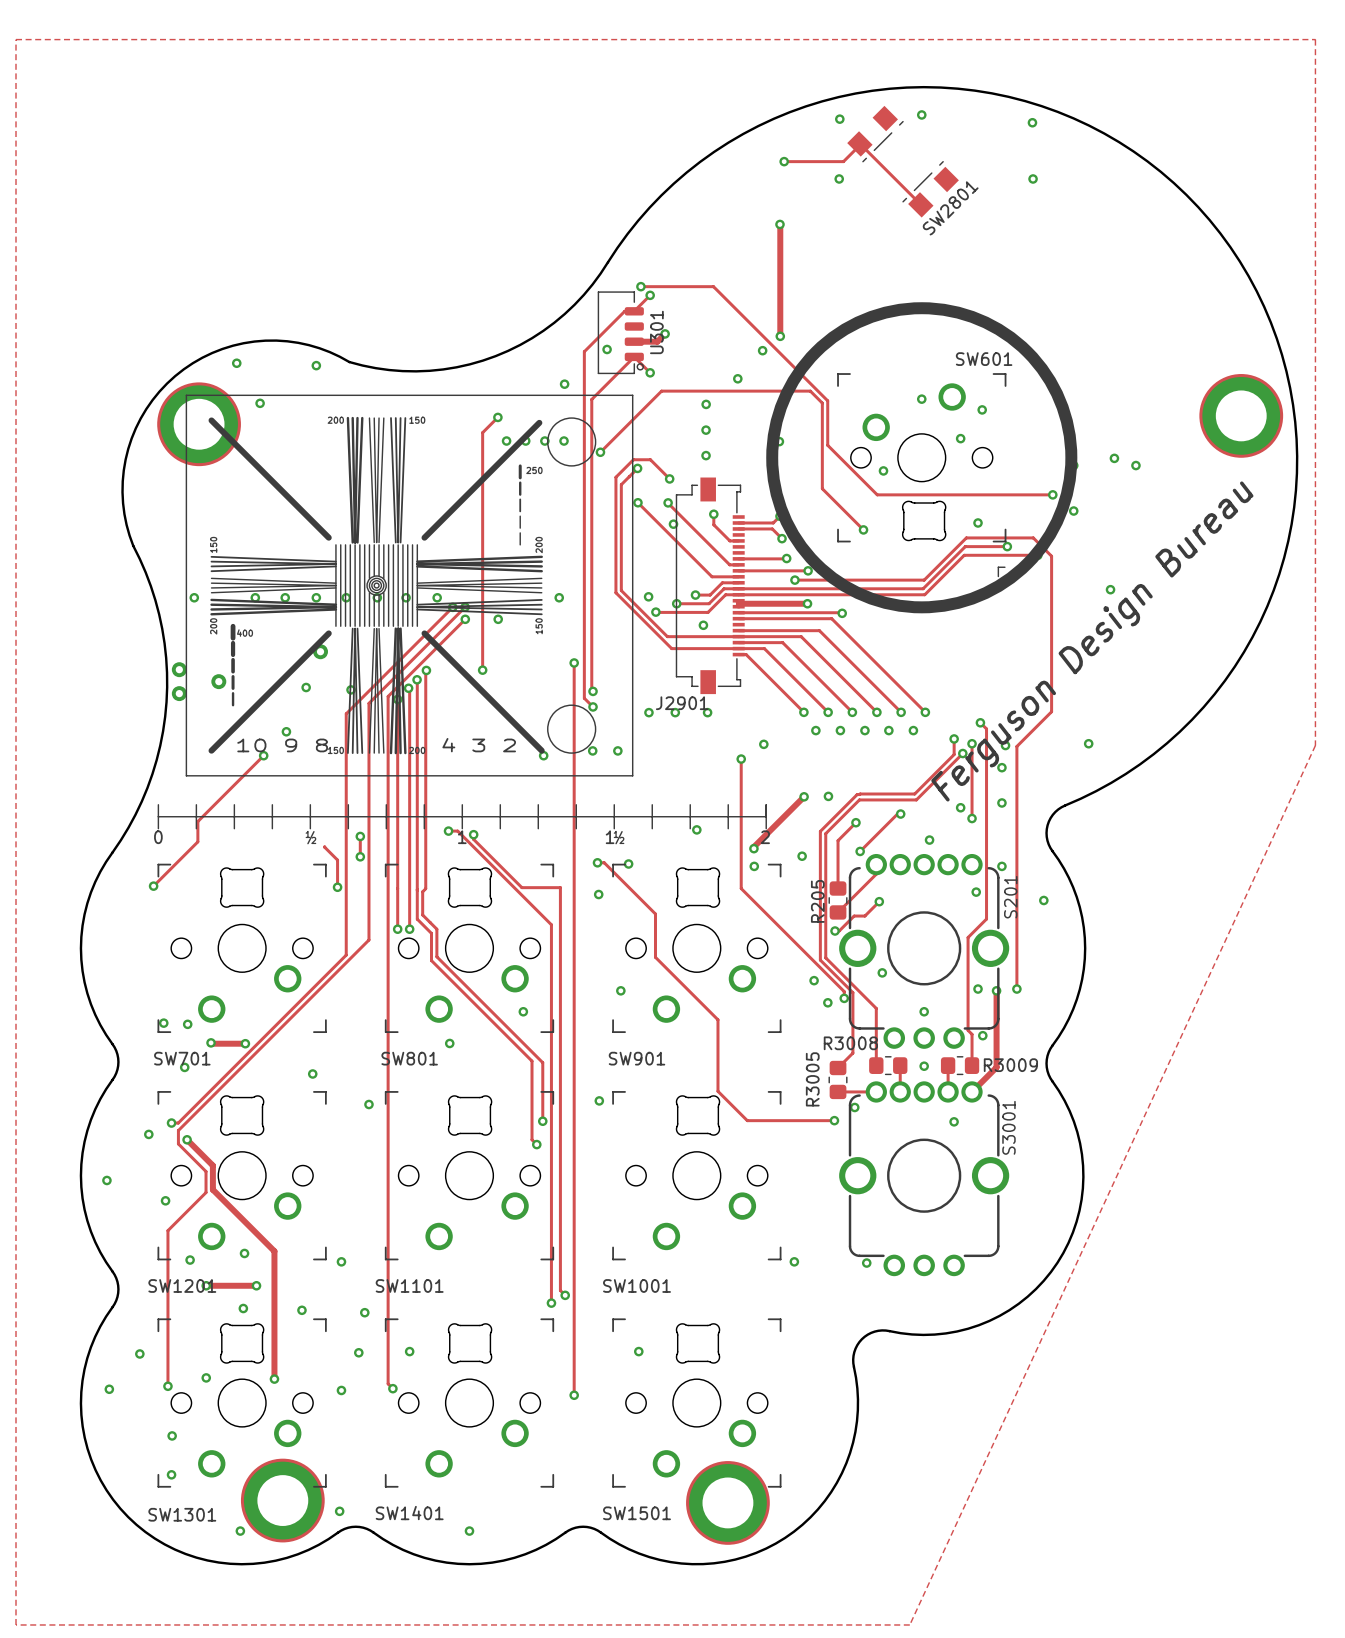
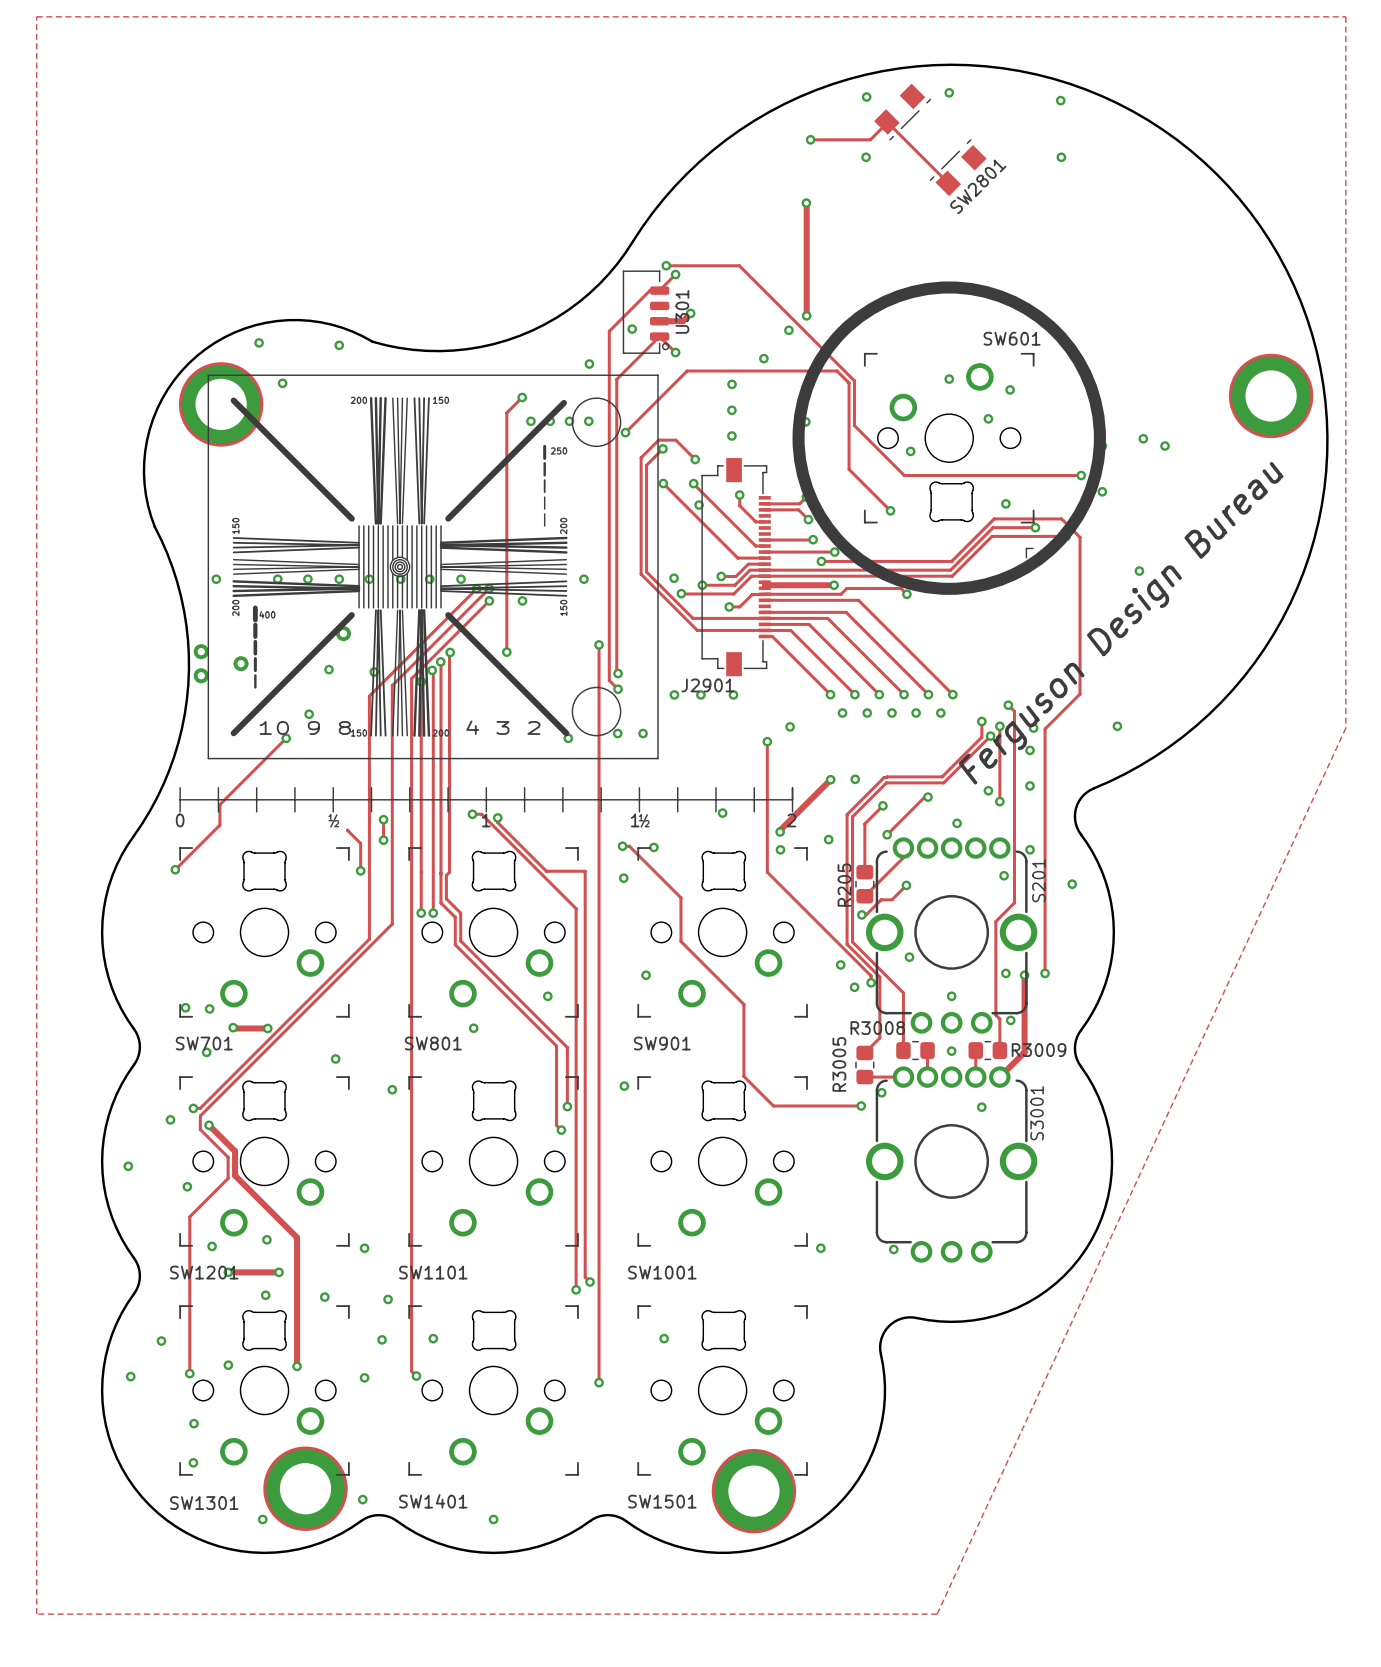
track: none -> (764, 594) (752, 594) (739, 606) (729, 606)
track: (814, 612) (842, 613) -> (840, 594) (846, 588) (901, 588) (906, 594)
via position: (842, 613) -> (906, 594)

